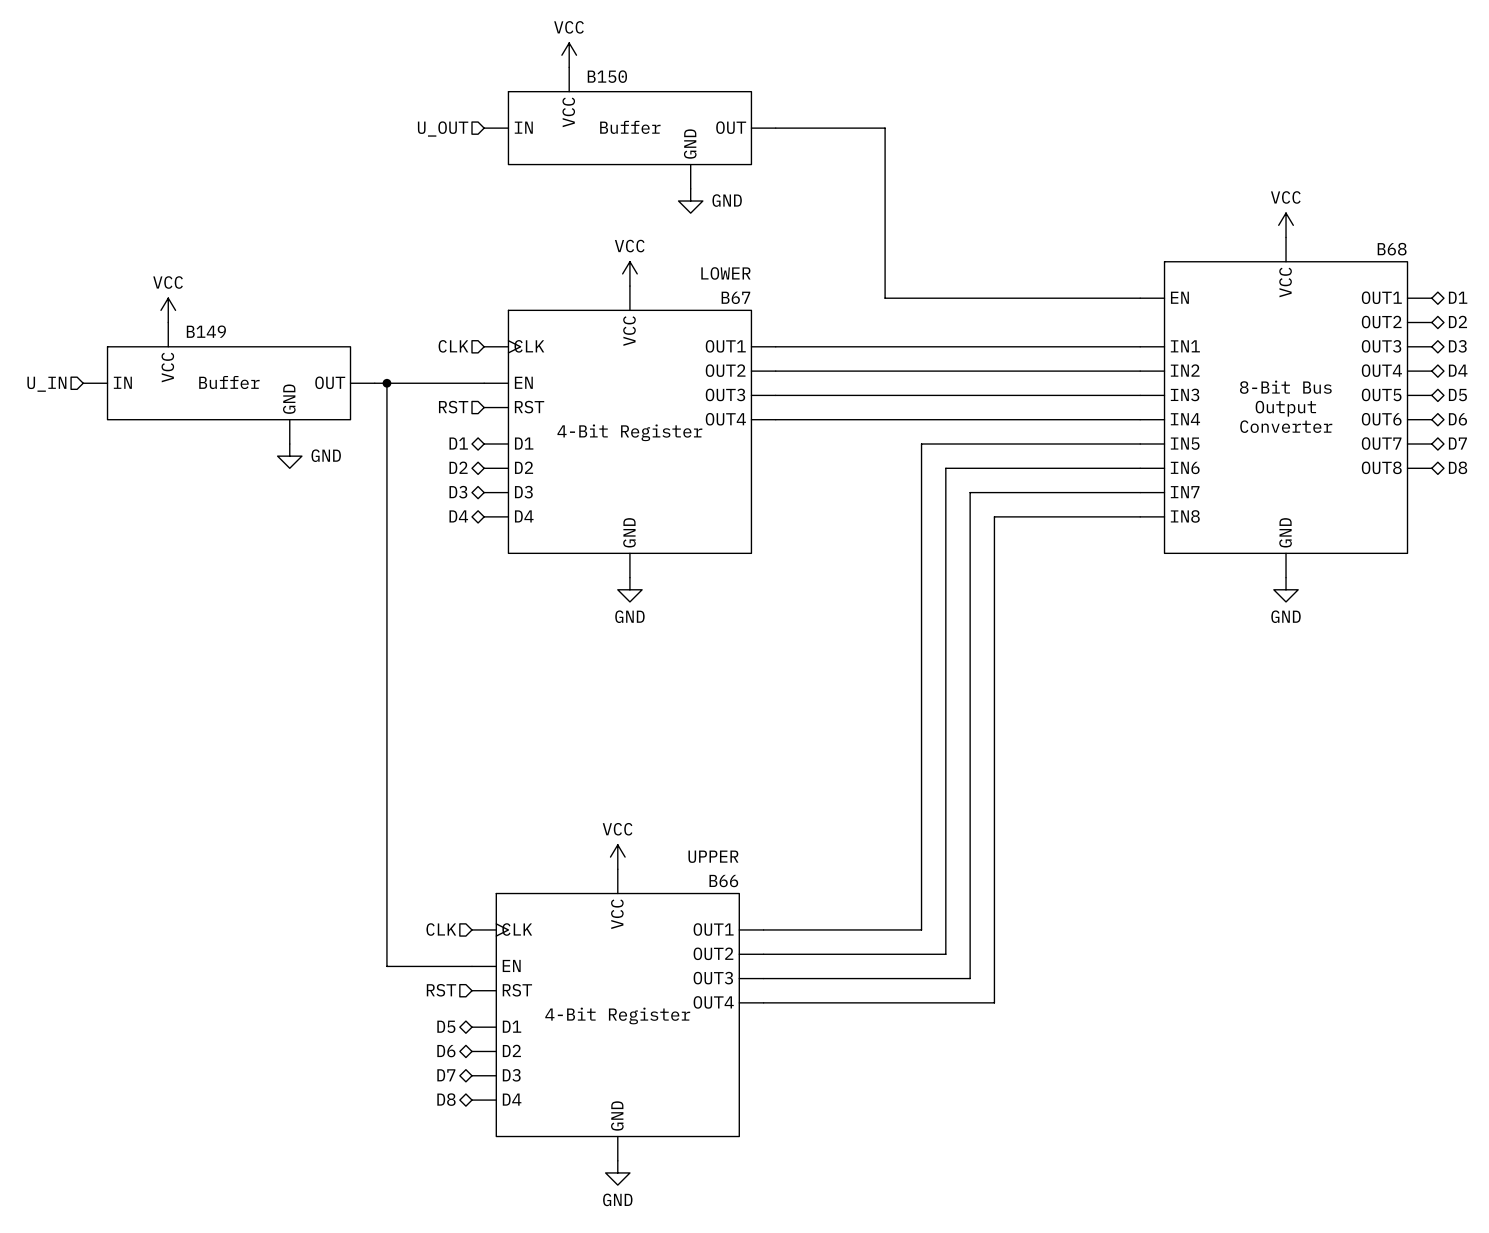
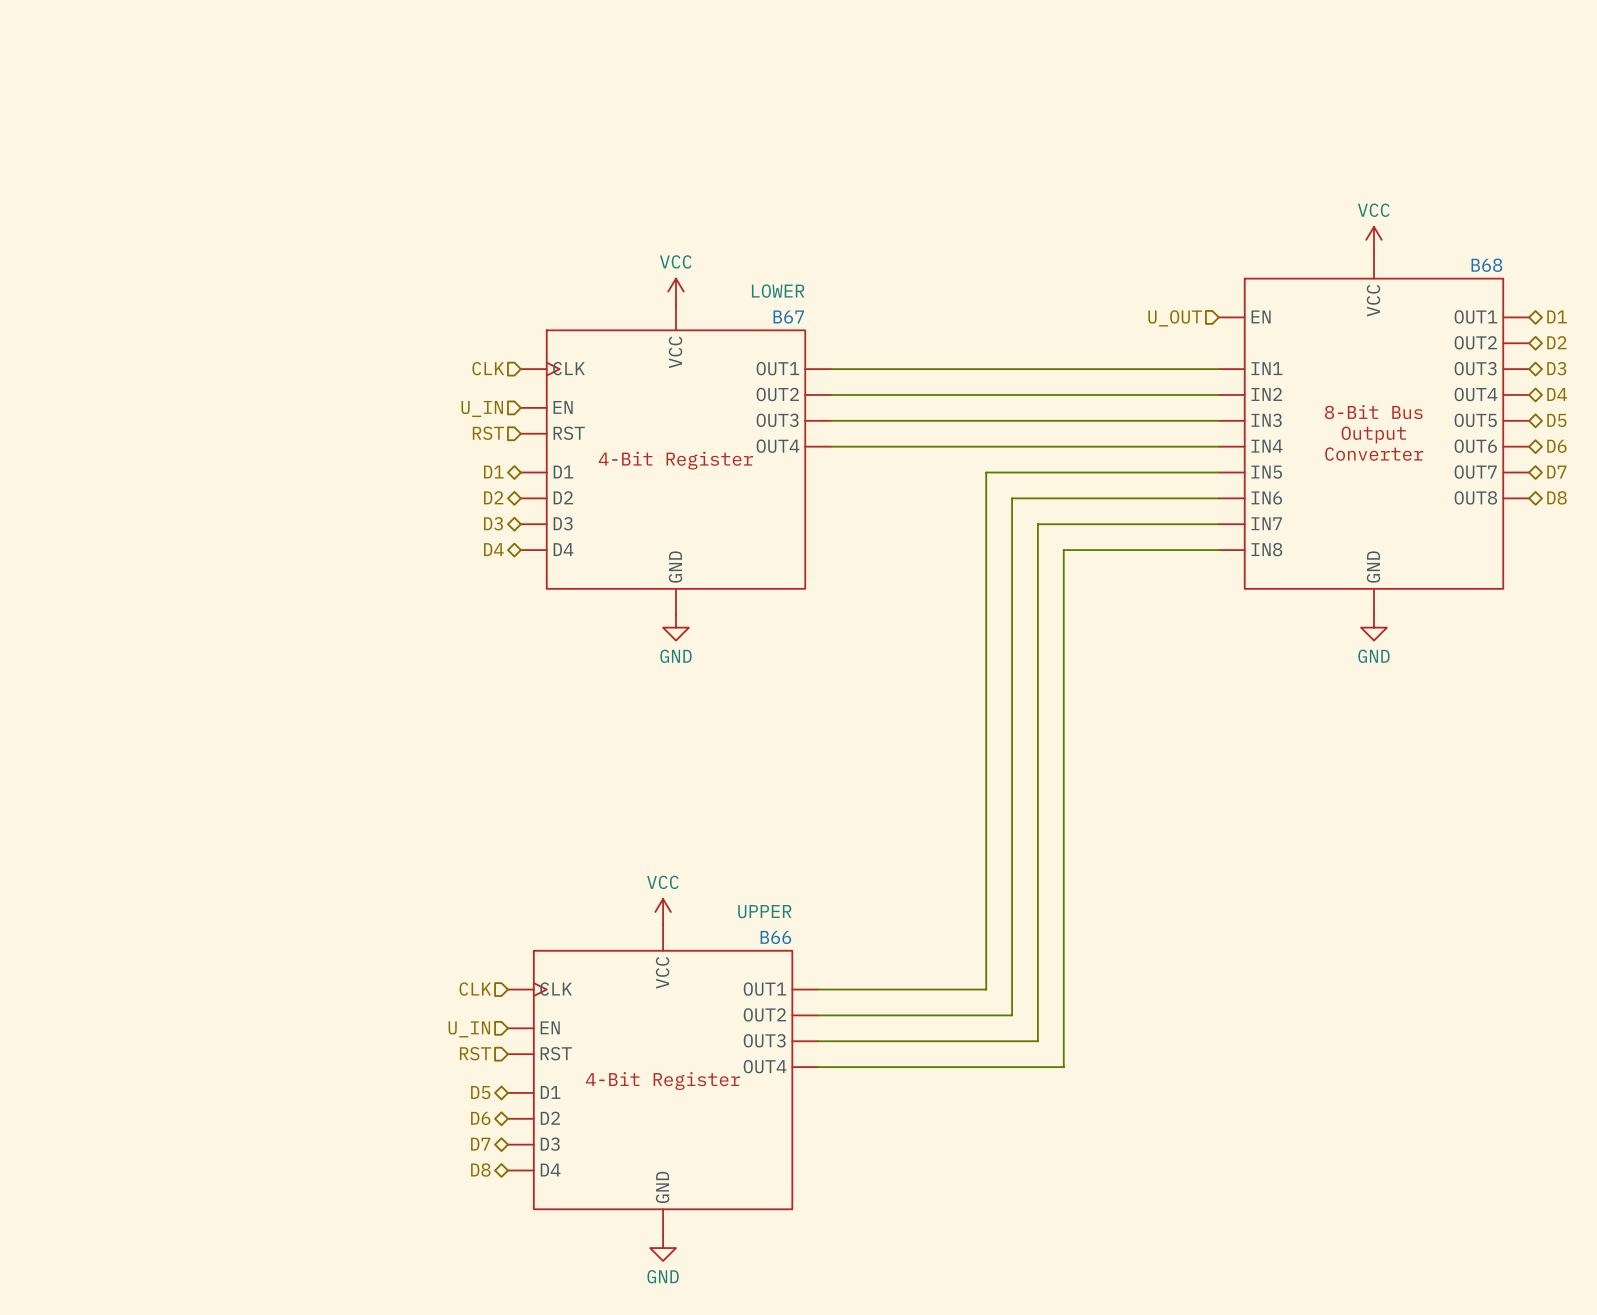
power symbol: VCC (569, 55) -> none
B150: (629, 128) -> none
wire: (775, 128) (885, 128) (885, 298) (1140, 298) -> none
hierarchical label: U_OUT (443, 129) -> none
power symbol: GND (690, 201) -> none
hierarchical label: none -> U_OUT (1175, 318)
power symbol: VCC (168, 310) -> none
B149: (229, 383) -> none
wire: (374, 383) (484, 383) -> none
wire: (386, 383) (386, 966) (472, 966) -> none
junction: (386, 383) -> none
hierarchical label: U_IN (46, 384) -> none
hierarchical label: none -> U_IN (482, 408)
power symbol: GND (289, 456) -> none
hierarchical label: none -> U_IN (469, 1029)

